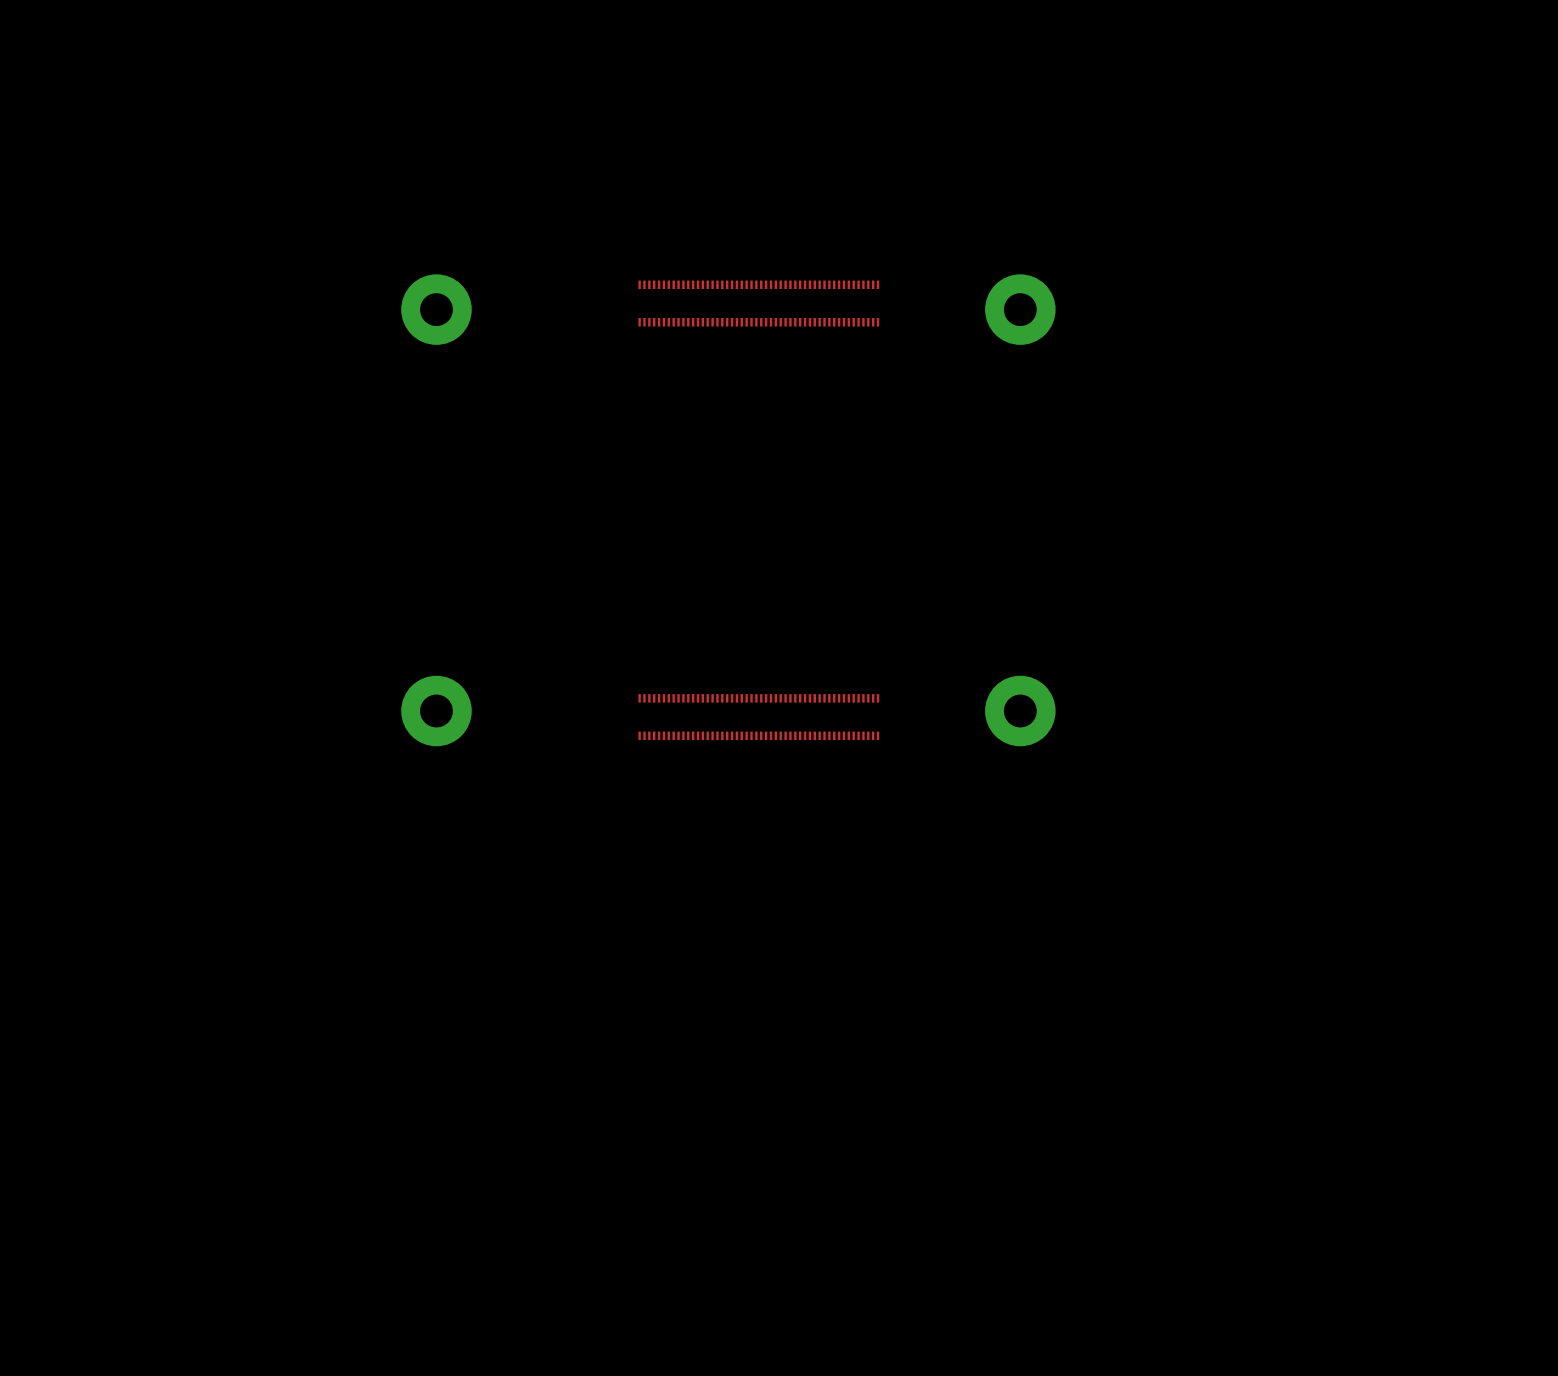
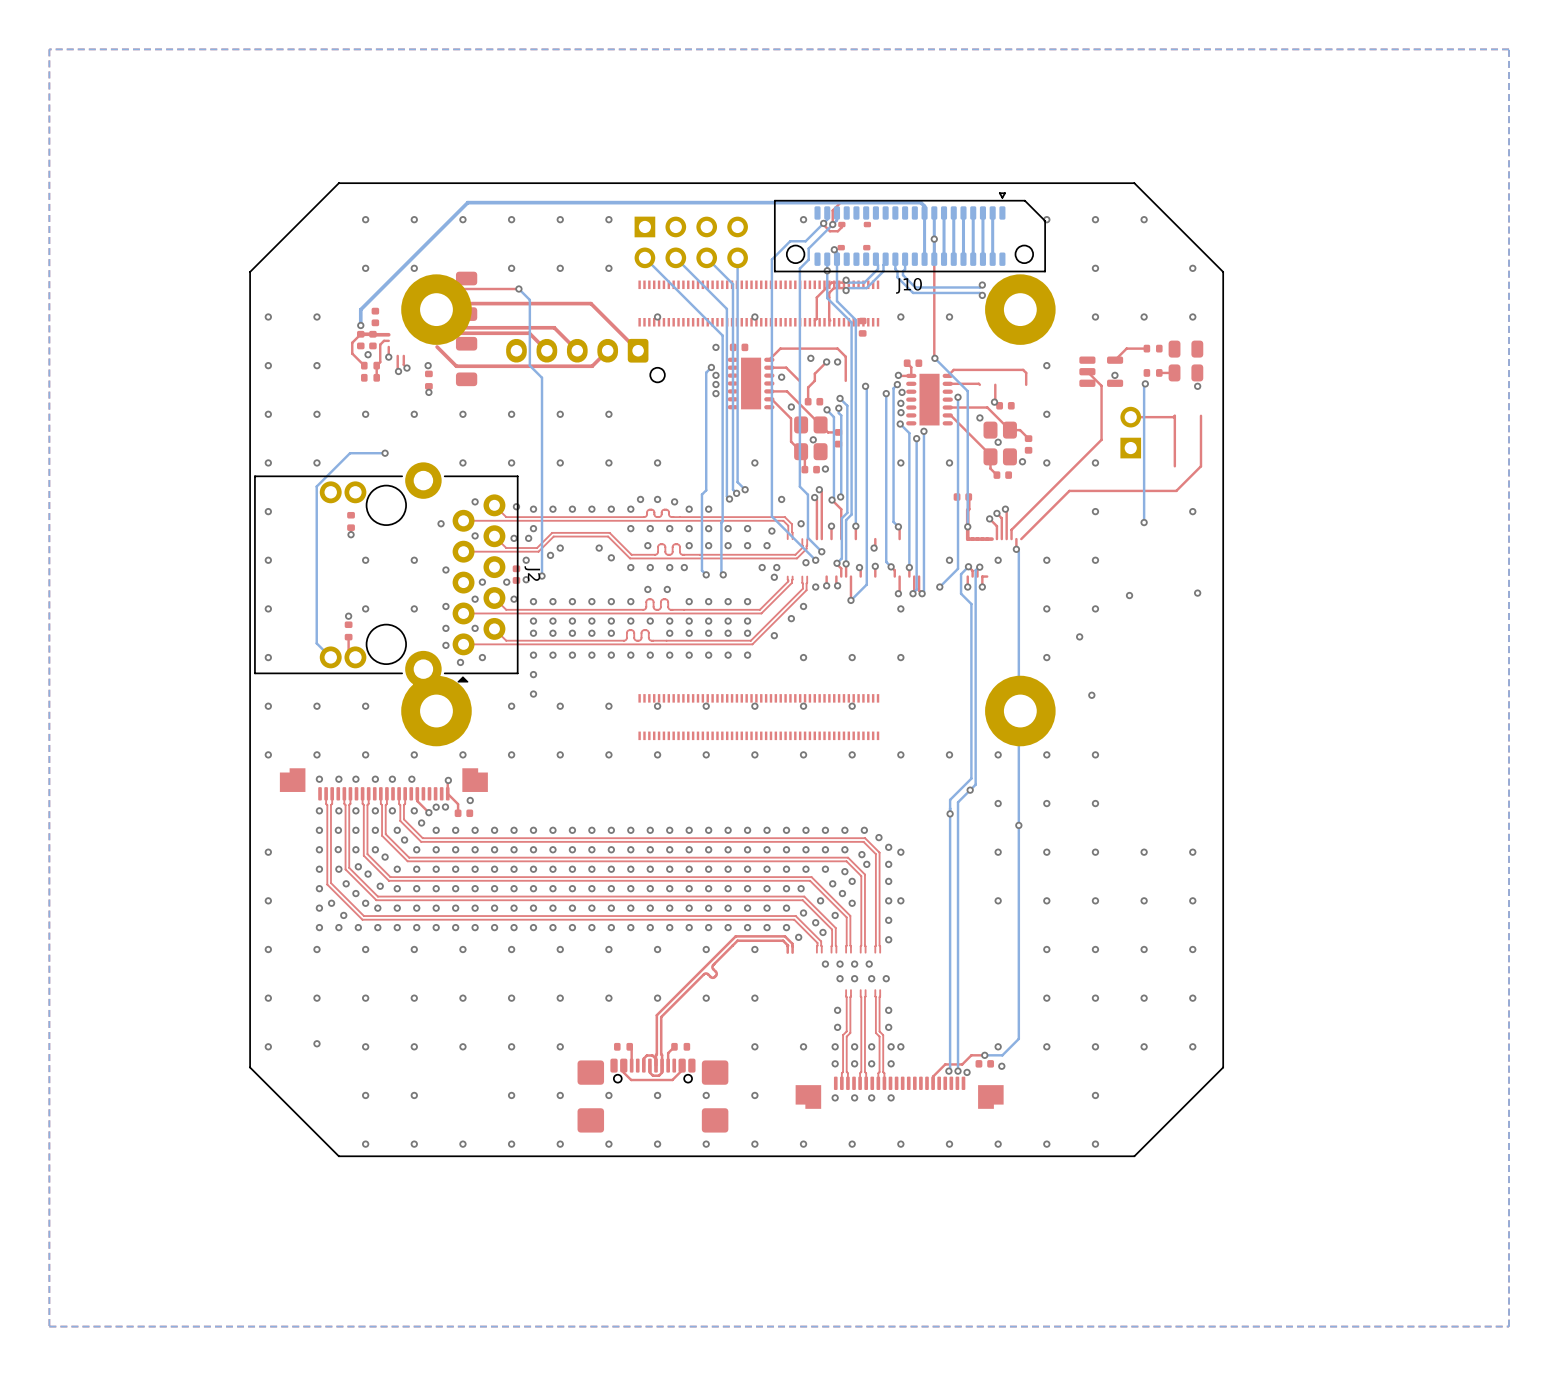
bottom zone outline: none -> (1509, 49) (49, 49) (49, 1326) (1509, 1326) (1509, 49)
board edge: none -> (1134, 183) (1223, 271) (1223, 1067) (1134, 1156) (338, 1156) (250, 1067) (250, 271) (338, 183) (1134, 183)
top track: none -> (841, 201) (832, 210) (832, 224)
bottom track: none -> (827, 212) (827, 219) (805, 241) (790, 241) (771, 259) (771, 516) (815, 560)
bottom track: none -> (836, 212) (836, 220) (808, 248) (808, 259) (799, 268) (799, 486) (807, 494) (807, 537) (821, 551)
bottom track: none -> (934, 212) (934, 259)
bottom track: none -> (944, 212) (944, 259)
bottom track: none -> (953, 212) (953, 259)
bottom track: none -> (963, 212) (963, 259)
bottom track: none -> (973, 212) (973, 259)
bottom track: none -> (982, 212) (982, 259)
bottom track: none -> (992, 212) (992, 259)
via: none -> (365, 219)
via: none -> (414, 219)
via: none -> (462, 219)
via: none -> (511, 219)
via: none -> (560, 219)
via: none -> (608, 219)
via: none -> (803, 219)
via: none -> (1046, 219)
via: none -> (1095, 219)
via: none -> (1144, 219)
top track: none -> (823, 223) (829, 231) (837, 231) (841, 224)
via: none -> (823, 223)
via: none -> (832, 224)
part: none -> (854, 224)
J10: none -> (909, 232)
top track: none -> (934, 239) (934, 358)
via: none -> (934, 239)
part: none -> (691, 242)
part: none -> (854, 247)
bottom track: none -> (834, 249) (836, 252) (836, 301) (855, 320) (855, 526)
via: none -> (834, 249)
bottom track: none -> (644, 257) (722, 335) (721, 573) (723, 574)
bottom track: none -> (675, 257) (726, 308) (726, 496) (729, 499)
bottom track: none -> (706, 257) (732, 284) (732, 489) (736, 493)
bottom track: none -> (737, 257) (737, 482) (745, 489)
bottom track: none -> (827, 259) (827, 298) (851, 322) (851, 514) (846, 520) (846, 563)
bottom track: none -> (875, 259) (878, 269) (864, 282) (848, 282) (846, 280)
bottom track: none -> (885, 259) (883, 271) (866, 288) (848, 288) (846, 290)
bottom track: none -> (895, 259) (897, 277) (913, 292) (979, 292) (982, 295)
bottom track: none -> (905, 259) (902, 275) (915, 287) (979, 287) (982, 285)
bottom track: none -> (924, 259) (924, 206) (920, 202) (467, 202) (360, 309) (360, 325)
via: none -> (365, 268)
via: none -> (414, 268)
via: none -> (511, 268)
via: none -> (560, 268)
via: none -> (608, 268)
via: none -> (1095, 268)
via: none -> (1192, 268)
via: none -> (827, 270)
top track: none -> (846, 280) (843, 282) (831, 282) (816, 297) (816, 318) (814, 320)
via: none -> (846, 280)
via: none -> (982, 285)
top track: none -> (518, 289) (436, 289) (422, 303) (422, 307)
bottom track: none -> (518, 289) (529, 299) (529, 365) (542, 377) (542, 576)
via: none -> (518, 289)
top track: none -> (846, 290) (843, 288) (833, 288) (829, 292) (830, 320)
via: none -> (846, 290)
via: none -> (982, 295)
part: none -> (466, 296)
via: none -> (268, 316)
via: none -> (316, 316)
part: none -> (375, 316)
top track: none -> (437, 316) (450, 303) (590, 303) (638, 350)
via: none -> (657, 316)
via: none -> (754, 316)
via: none -> (900, 316)
via: none -> (949, 316)
via: none -> (1095, 316)
via: none -> (1144, 316)
via: none -> (1192, 316)
via: none -> (360, 325)
part: none -> (862, 327)
top track: none -> (437, 328) (554, 327) (577, 350)
top track: none -> (388, 334) (360, 334) (352, 342) (352, 353) (364, 365)
top track: none -> (437, 334) (529, 333) (546, 350)
part: none -> (360, 340)
part: none -> (372, 340)
top track: none -> (388, 340) (384, 340) (380, 344) (380, 362) (376, 365) (376, 377)
top track: none -> (388, 346) (388, 357)
top track: none -> (437, 346) (456, 366) (592, 366) (607, 350)
via: none -> (715, 347)
part: none -> (739, 347)
top track: none -> (1146, 348) (1126, 348) (1115, 360)
part: none -> (1153, 348)
part: none -> (1185, 349)
via: none -> (368, 354)
top track: none -> (397, 355) (398, 371)
top track: none -> (403, 355) (403, 364) (406, 368)
via: none -> (388, 357)
via: none -> (810, 358)
bottom track: none -> (934, 358) (967, 391) (967, 526)
via: none -> (934, 358)
top track: none -> (769, 359) (780, 348) (837, 348) (845, 356) (845, 380)
part: none -> (585, 360)
part: none -> (466, 361)
top track: none -> (826, 361) (814, 373) (814, 380) (808, 387) (808, 401)
via: none -> (826, 361)
via: none -> (837, 361)
top track: none -> (907, 363) (911, 367) (911, 375) (898, 375)
part: none -> (913, 363)
via: none -> (268, 365)
via: none -> (316, 365)
part: none -> (370, 365)
via: none -> (428, 365)
via: none -> (1046, 365)
bottom track: none -> (711, 367) (706, 372) (706, 490) (701, 494) (701, 570) (706, 574)
via: none -> (711, 367)
top track: none -> (769, 367) (786, 367) (799, 380)
via: none -> (406, 368)
via: none -> (398, 371)
top track: none -> (1087, 371) (1101, 385) (1101, 439) (1011, 529) (1011, 539)
part: none -> (1101, 371)
part: none -> (1153, 372)
top track: none -> (1174, 372) (1159, 372)
part: none -> (1185, 372)
via: none -> (715, 375)
via: none -> (898, 375)
top track: none -> (947, 375) (953, 369) (1023, 369) (1026, 372) (1026, 384)
via: none -> (1114, 375)
part: none -> (370, 377)
via: none -> (781, 377)
part: none -> (428, 380)
part: none -> (751, 383)
top track: none -> (947, 383) (979, 384)
bottom track: none -> (1145, 383) (1144, 522)
via: none -> (1145, 383)
via: none -> (715, 384)
bottom track: none -> (897, 384) (893, 388) (893, 521) (898, 526)
via: none -> (897, 384)
top track: none -> (995, 384) (994, 402) (999, 405)
bottom track: none -> (865, 386) (866, 584) (850, 600)
via: none -> (865, 386)
via: none -> (1197, 386)
top track: none -> (769, 391) (787, 391) (828, 432) (838, 432)
via: none -> (428, 392)
via: none -> (902, 392)
via: none -> (715, 393)
bottom track: none -> (886, 393) (886, 561) (891, 566)
via: none -> (886, 393)
bottom track: none -> (958, 397) (958, 568) (939, 587)
via: none -> (958, 397)
bottom track: none -> (840, 398) (847, 405) (847, 512) (841, 518) (841, 558) (837, 563)
via: none -> (840, 398)
top track: none -> (769, 399) (771, 399) (791, 418) (791, 441) (804, 455) (804, 469)
part: none -> (929, 399)
part: none -> (813, 401)
via: none -> (994, 402)
via: none -> (900, 403)
part: none -> (1005, 405)
via: none -> (791, 406)
top track: none -> (947, 407) (987, 407) (1009, 430) (1020, 430) (1028, 438)
bottom track: none -> (838, 408) (838, 413) (841, 415) (840, 497)
via: none -> (838, 408)
bottom track: none -> (827, 409) (833, 417) (833, 498) (832, 500)
via: none -> (827, 409)
via: none -> (901, 412)
via: none -> (268, 414)
via: none -> (316, 414)
via: none -> (365, 414)
via: none -> (414, 414)
via: none -> (462, 414)
via: none -> (511, 414)
via: none -> (560, 414)
via: none -> (608, 414)
via: none -> (1046, 414)
top track: none -> (947, 415) (950, 415) (990, 455) (990, 468) (996, 475)
top track: none -> (1200, 415) (1200, 466) (1176, 490) (1069, 490) (1021, 539)
via: none -> (979, 417)
top track: none -> (1130, 417) (1174, 415) (1174, 466)
bottom track: none -> (900, 424) (909, 433) (909, 567)
via: none -> (900, 424)
bottom track: none -> (923, 431) (923, 591) (922, 593)
via: none -> (923, 431)
part: none -> (1130, 432)
part: none -> (810, 438)
part: none -> (838, 438)
bottom track: none -> (916, 438) (916, 589) (913, 593)
via: none -> (916, 438)
via: none -> (813, 439)
via: none -> (998, 442)
part: none -> (1000, 443)
part: none -> (1028, 444)
bottom track: none -> (385, 453) (350, 453) (316, 486) (316, 643) (330, 657)
via: none -> (385, 453)
via: none -> (1022, 461)
via: none -> (268, 462)
via: none -> (316, 462)
via: none -> (462, 462)
via: none -> (511, 462)
via: none -> (560, 462)
via: none -> (608, 462)
via: none -> (657, 462)
via: none -> (754, 462)
via: none -> (900, 462)
via: none -> (949, 462)
via: none -> (1046, 462)
via: none -> (1095, 462)
part: none -> (810, 469)
via: none -> (825, 469)
part: none -> (1002, 475)
via: none -> (745, 489)
top track: none -> (819, 489) (821, 492) (821, 539)
via: none -> (819, 489)
via: none -> (736, 493)
top track: none -> (814, 497) (816, 499) (816, 539)
via: none -> (814, 497)
via: none -> (840, 497)
part: none -> (962, 497)
top track: none -> (968, 497) (967, 539) (992, 539)
via: none -> (640, 499)
via: none -> (657, 499)
via: none -> (729, 499)
via: none -> (781, 499)
top track: none -> (832, 500) (841, 509) (841, 539)
via: none -> (832, 500)
via: none -> (475, 501)
via: none -> (674, 501)
top track: none -> (494, 505) (506, 517) (644, 517) (650, 509) (653, 510) (655, 516) (658, 517) (664, 509) (668, 510) (671, 517) (784, 517) (791, 524) (792, 539)
via: none -> (516, 506)
via: none -> (533, 509)
via: none -> (552, 509)
via: none -> (572, 509)
via: none -> (591, 509)
via: none -> (611, 509)
via: none -> (630, 509)
via: none -> (689, 509)
via: none -> (708, 509)
top track: none -> (1005, 509) (1006, 539)
via: none -> (1005, 509)
via: none -> (268, 511)
via: none -> (1095, 511)
via: none -> (1192, 511)
top track: none -> (996, 513) (1001, 518) (1001, 539)
via: none -> (996, 513)
top track: none -> (989, 518) (996, 526) (996, 539)
via: none -> (989, 518)
top track: none -> (463, 520) (783, 520) (788, 525) (787, 539)
part: none -> (351, 521)
via: none -> (1144, 522)
via: none -> (441, 523)
via: none -> (801, 523)
top track: none -> (831, 526) (831, 539)
via: none -> (831, 526)
top track: none -> (855, 526) (855, 539)
via: none -> (855, 526)
top track: none -> (898, 526) (899, 539)
via: none -> (898, 526)
via: none -> (967, 526)
via: none -> (533, 528)
via: none -> (630, 528)
via: none -> (650, 528)
via: none -> (669, 528)
via: none -> (689, 528)
via: none -> (708, 528)
via: none -> (728, 528)
via: none -> (747, 528)
via: none -> (771, 531)
via: none -> (351, 534)
via: none -> (475, 535)
top track: none -> (494, 536) (506, 548) (537, 548) (552, 532) (609, 532) (631, 554) (656, 554) (658, 545) (660, 544) (664, 545) (665, 552) (667, 554) (672, 553) (672, 545) (677, 544) (679, 545) (680, 552) (682, 554) (795, 554) (802, 547) (802, 539)
via: none -> (514, 538)
via: none -> (528, 538)
top track: none -> (807, 539) (806, 548) (796, 558) (630, 558) (608, 536) (553, 536) (538, 551) (463, 551)
top track: none -> (875, 539) (874, 548)
top track: none -> (1016, 539) (1016, 549)
via: none -> (647, 545)
via: none -> (689, 545)
via: none -> (708, 545)
via: none -> (728, 545)
via: none -> (747, 545)
via: none -> (767, 545)
via: none -> (560, 548)
via: none -> (599, 548)
via: none -> (874, 548)
bottom track: none -> (1016, 549) (1018, 551) (1018, 1038) (1002, 1055) (984, 1055)
via: none -> (1016, 549)
via: none -> (821, 551)
via: none -> (550, 555)
via: none -> (611, 557)
via: none -> (268, 560)
via: none -> (365, 560)
via: none -> (414, 560)
via: none -> (526, 560)
via: none -> (815, 560)
via: none -> (949, 560)
via: none -> (998, 560)
via: none -> (1046, 560)
via: none -> (1095, 560)
via: none -> (805, 562)
top track: none -> (837, 563) (841, 568) (841, 576)
via: none -> (837, 563)
top track: none -> (846, 563) (846, 576)
via: none -> (846, 563)
top track: none -> (875, 566) (875, 576)
via: none -> (875, 566)
top track: none -> (891, 566) (894, 570) (894, 576)
via: none -> (891, 566)
top track: none -> (968, 566) (972, 570) (972, 576)
bottom track: none -> (968, 566) (961, 574) (961, 593) (971, 604) (971, 778) (950, 799) (948, 1071)
via: none -> (968, 566)
via: none -> (630, 567)
via: none -> (650, 567)
via: none -> (669, 567)
via: none -> (684, 567)
via: none -> (762, 567)
via: none -> (776, 567)
top track: none -> (859, 567) (860, 576)
via: none -> (859, 567)
top track: none -> (909, 567) (909, 576)
via: none -> (909, 567)
top track: none -> (979, 567) (977, 568) (977, 576)
bottom track: none -> (979, 567) (975, 570) (975, 784) (958, 802) (958, 1071)
via: none -> (979, 567)
via: none -> (445, 569)
J2: none -> (386, 574)
part: none -> (516, 574)
via: none -> (706, 574)
via: none -> (723, 574)
via: none -> (542, 576)
top track: none -> (787, 576) (788, 581) (759, 609) (670, 609) (668, 607) (667, 600) (665, 599) (661, 600) (660, 608) (656, 609) (653, 607) (653, 600) (650, 599) (646, 600) (646, 607) (643, 609) (506, 609) (494, 598)
top track: none -> (792, 576) (791, 582) (761, 613) (463, 613)
top track: none -> (802, 576) (802, 588) (750, 640) (651, 640) (648, 638) (648, 631) (645, 630) (641, 631) (641, 638) (638, 640) (634, 639) (633, 631) (629, 630) (627, 631) (626, 638) (624, 640) (506, 640) (494, 628)
top track: none -> (807, 576) (806, 590) (752, 644) (463, 644)
top track: none -> (826, 576) (826, 585)
top track: none -> (836, 576) (837, 585)
top track: none -> (850, 576) (850, 600)
top track: none -> (899, 576) (898, 593)
top track: none -> (914, 576) (913, 593)
top track: none -> (919, 576) (919, 590) (922, 593)
top track: none -> (967, 576) (967, 587)
top track: none -> (987, 576) (982, 576) (982, 587)
via: none -> (774, 577)
via: none -> (526, 579)
via: none -> (482, 582)
via: none -> (506, 582)
via: none -> (826, 585)
via: none -> (837, 585)
via: none -> (815, 587)
via: none -> (939, 587)
via: none -> (967, 587)
via: none -> (982, 587)
via: none -> (647, 589)
via: none -> (667, 589)
via: none -> (898, 593)
via: none -> (913, 593)
via: none -> (922, 593)
via: none -> (1197, 593)
via: none -> (1129, 595)
via: none -> (475, 599)
via: none -> (514, 599)
via: none -> (850, 600)
via: none -> (533, 601)
via: none -> (552, 601)
via: none -> (572, 601)
via: none -> (591, 601)
via: none -> (611, 601)
via: none -> (630, 601)
via: none -> (689, 601)
via: none -> (708, 601)
via: none -> (728, 601)
via: none -> (747, 601)
via: none -> (445, 606)
via: none -> (803, 606)
via: none -> (268, 608)
via: none -> (365, 608)
via: none -> (414, 608)
via: none -> (900, 608)
via: none -> (1046, 608)
via: none -> (1095, 608)
via: none -> (348, 616)
via: none -> (791, 618)
via: none -> (533, 621)
via: none -> (552, 621)
via: none -> (572, 621)
via: none -> (591, 621)
via: none -> (611, 621)
via: none -> (630, 621)
via: none -> (650, 621)
via: none -> (669, 621)
via: none -> (689, 621)
via: none -> (708, 621)
via: none -> (728, 621)
via: none -> (747, 621)
via: none -> (445, 628)
via: none -> (475, 628)
part: none -> (348, 630)
via: none -> (533, 633)
via: none -> (552, 633)
via: none -> (572, 633)
via: none -> (591, 633)
via: none -> (611, 633)
via: none -> (669, 633)
via: none -> (689, 633)
via: none -> (708, 633)
via: none -> (728, 633)
via: none -> (747, 633)
via: none -> (774, 635)
via: none -> (1079, 636)
top track: none -> (348, 637) (348, 650) (355, 657)
via: none -> (445, 645)
via: none -> (533, 655)
via: none -> (552, 655)
via: none -> (572, 655)
via: none -> (591, 655)
via: none -> (611, 655)
via: none -> (630, 655)
via: none -> (650, 655)
via: none -> (669, 655)
via: none -> (689, 655)
via: none -> (708, 655)
via: none -> (728, 655)
via: none -> (747, 655)
via: none -> (268, 657)
via: none -> (482, 657)
via: none -> (803, 657)
via: none -> (852, 657)
via: none -> (900, 657)
via: none -> (1046, 657)
via: none -> (460, 662)
via: none -> (533, 674)
via: none -> (533, 694)
via: none -> (1091, 695)
via: none -> (268, 706)
via: none -> (316, 706)
via: none -> (365, 706)
via: none -> (511, 706)
via: none -> (560, 706)
via: none -> (608, 706)
via: none -> (657, 706)
via: none -> (706, 706)
via: none -> (754, 706)
via: none -> (803, 706)
via: none -> (852, 706)
via: none -> (268, 754)
via: none -> (316, 754)
via: none -> (365, 754)
via: none -> (414, 754)
via: none -> (462, 754)
via: none -> (511, 754)
via: none -> (560, 754)
via: none -> (608, 754)
via: none -> (657, 754)
via: none -> (706, 754)
via: none -> (754, 754)
via: none -> (803, 754)
via: none -> (852, 754)
via: none -> (900, 754)
via: none -> (949, 754)
via: none -> (998, 754)
via: none -> (1046, 754)
via: none -> (1095, 754)
via: none -> (319, 779)
via: none -> (338, 779)
via: none -> (355, 779)
via: none -> (375, 779)
via: none -> (392, 779)
via: none -> (411, 779)
top track: none -> (448, 780) (447, 793) (458, 804) (458, 813)
via: none -> (448, 780)
part: none -> (383, 784)
via: none -> (970, 790)
top track: none -> (326, 793) (327, 884) (362, 919) (794, 919) (817, 942) (816, 952)
top track: none -> (332, 793) (330, 883) (363, 916) (795, 916) (821, 941) (821, 952)
top track: none -> (344, 793) (345, 869) (376, 900) (802, 900) (832, 929) (831, 952)
top track: none -> (350, 793) (349, 867) (377, 896) (804, 896) (835, 928) (836, 952)
top track: none -> (362, 793) (363, 855) (388, 880) (810, 880) (846, 917) (846, 952)
top track: none -> (368, 793) (367, 854) (390, 877) (811, 877) (850, 915) (850, 952)
top track: none -> (380, 793) (382, 835) (407, 861) (846, 861) (861, 876) (860, 952)
top track: none -> (386, 793) (385, 834) (409, 857) (848, 857) (864, 874) (865, 952)
top track: none -> (399, 793) (400, 820) (421, 841) (863, 841) (875, 854) (875, 952)
top track: none -> (405, 793) (403, 819) (422, 838) (865, 838) (879, 852) (880, 952)
top track: none -> (417, 793) (417, 801) (428, 812)
via: none -> (470, 800)
via: none -> (998, 803)
via: none -> (1046, 803)
via: none -> (1095, 803)
via: none -> (436, 807)
via: none -> (445, 807)
via: none -> (319, 810)
via: none -> (338, 810)
via: none -> (355, 810)
via: none -> (375, 810)
via: none -> (392, 810)
via: none -> (414, 810)
via: none -> (428, 812)
part: none -> (463, 813)
via: none -> (950, 813)
via: none -> (421, 822)
via: none -> (1018, 825)
via: none -> (319, 830)
via: none -> (338, 830)
via: none -> (355, 830)
via: none -> (375, 830)
via: none -> (397, 830)
via: none -> (436, 830)
via: none -> (455, 830)
via: none -> (475, 830)
via: none -> (494, 830)
via: none -> (514, 830)
via: none -> (533, 830)
via: none -> (552, 830)
via: none -> (572, 830)
via: none -> (591, 830)
via: none -> (611, 830)
via: none -> (630, 830)
via: none -> (650, 830)
via: none -> (669, 830)
via: none -> (689, 830)
via: none -> (708, 830)
via: none -> (728, 830)
via: none -> (747, 830)
via: none -> (767, 830)
via: none -> (786, 830)
via: none -> (805, 830)
via: none -> (825, 830)
via: none -> (844, 830)
via: none -> (864, 830)
via: none -> (878, 837)
via: none -> (404, 840)
via: none -> (888, 847)
via: none -> (319, 849)
via: none -> (338, 849)
via: none -> (355, 849)
via: none -> (375, 849)
via: none -> (416, 849)
via: none -> (436, 849)
via: none -> (455, 849)
via: none -> (475, 849)
via: none -> (494, 849)
via: none -> (514, 849)
via: none -> (533, 849)
via: none -> (552, 849)
via: none -> (572, 849)
via: none -> (591, 849)
via: none -> (611, 849)
via: none -> (630, 849)
via: none -> (650, 849)
via: none -> (669, 849)
via: none -> (689, 849)
via: none -> (708, 849)
via: none -> (728, 849)
via: none -> (747, 849)
via: none -> (767, 849)
via: none -> (786, 849)
via: none -> (805, 849)
via: none -> (825, 849)
via: none -> (844, 849)
via: none -> (268, 852)
via: none -> (900, 852)
via: none -> (998, 852)
via: none -> (1046, 852)
via: none -> (1095, 852)
via: none -> (1144, 852)
via: none -> (1192, 852)
via: none -> (861, 854)
via: none -> (385, 857)
via: none -> (866, 864)
via: none -> (888, 864)
via: none -> (358, 866)
via: none -> (319, 869)
via: none -> (338, 869)
via: none -> (397, 869)
via: none -> (416, 869)
via: none -> (436, 869)
via: none -> (455, 869)
via: none -> (475, 869)
via: none -> (494, 869)
via: none -> (514, 869)
via: none -> (533, 869)
via: none -> (552, 869)
via: none -> (572, 869)
via: none -> (591, 869)
via: none -> (611, 869)
via: none -> (630, 869)
via: none -> (650, 869)
via: none -> (669, 869)
via: none -> (689, 869)
via: none -> (708, 869)
via: none -> (728, 869)
via: none -> (747, 869)
via: none -> (767, 869)
via: none -> (786, 869)
via: none -> (805, 869)
via: none -> (825, 869)
via: none -> (844, 871)
via: none -> (368, 874)
via: none -> (852, 881)
via: none -> (888, 881)
via: none -> (346, 883)
via: none -> (832, 883)
via: none -> (380, 886)
via: none -> (319, 888)
via: none -> (397, 888)
via: none -> (416, 888)
via: none -> (436, 888)
via: none -> (455, 888)
via: none -> (475, 888)
via: none -> (494, 888)
via: none -> (514, 888)
via: none -> (533, 888)
via: none -> (552, 888)
via: none -> (572, 888)
via: none -> (591, 888)
via: none -> (611, 888)
via: none -> (630, 888)
via: none -> (650, 888)
via: none -> (669, 888)
via: none -> (689, 888)
via: none -> (708, 888)
via: none -> (728, 888)
via: none -> (747, 888)
via: none -> (767, 888)
via: none -> (786, 888)
via: none -> (801, 888)
via: none -> (355, 893)
via: none -> (842, 893)
via: none -> (268, 900)
via: none -> (820, 900)
via: none -> (888, 900)
via: none -> (900, 900)
via: none -> (998, 900)
via: none -> (1046, 900)
via: none -> (1095, 900)
via: none -> (1144, 900)
via: none -> (1192, 900)
via: none -> (331, 903)
via: none -> (365, 903)
via: none -> (852, 903)
via: none -> (319, 908)
via: none -> (377, 908)
via: none -> (397, 908)
via: none -> (416, 908)
via: none -> (436, 908)
via: none -> (455, 908)
via: none -> (475, 908)
via: none -> (494, 908)
via: none -> (514, 908)
via: none -> (533, 908)
via: none -> (552, 908)
via: none -> (572, 908)
via: none -> (591, 908)
via: none -> (611, 908)
via: none -> (630, 908)
via: none -> (650, 908)
via: none -> (669, 908)
via: none -> (689, 908)
via: none -> (708, 908)
via: none -> (728, 908)
via: none -> (747, 908)
via: none -> (767, 908)
via: none -> (786, 908)
via: none -> (803, 913)
via: none -> (343, 915)
via: none -> (835, 915)
via: none -> (888, 920)
via: none -> (815, 922)
via: none -> (319, 927)
via: none -> (338, 927)
via: none -> (358, 927)
via: none -> (377, 927)
via: none -> (397, 927)
via: none -> (416, 927)
via: none -> (436, 927)
via: none -> (455, 927)
via: none -> (475, 927)
via: none -> (494, 927)
via: none -> (514, 927)
via: none -> (533, 927)
via: none -> (552, 927)
via: none -> (572, 927)
via: none -> (591, 927)
via: none -> (611, 927)
via: none -> (630, 927)
via: none -> (650, 927)
via: none -> (669, 927)
via: none -> (689, 927)
via: none -> (708, 927)
via: none -> (728, 927)
via: none -> (747, 927)
via: none -> (767, 927)
via: none -> (786, 927)
via: none -> (822, 932)
via: none -> (798, 937)
via: none -> (888, 939)
via: none -> (268, 949)
via: none -> (316, 949)
via: none -> (365, 949)
via: none -> (414, 949)
via: none -> (462, 949)
via: none -> (511, 949)
via: none -> (560, 949)
via: none -> (608, 949)
via: none -> (657, 949)
via: none -> (706, 949)
via: none -> (754, 949)
via: none -> (1046, 949)
via: none -> (1095, 949)
via: none -> (1144, 949)
via: none -> (1192, 949)
top track: none -> (787, 952) (787, 945) (783, 940) (737, 940) (712, 965) (716, 973) (715, 975) (712, 977) (707, 973) (704, 974) (661, 1017) (662, 1072) (658, 1075) (653, 1075) (649, 1072) (649, 1065)
top track: none -> (792, 952) (792, 943) (784, 936) (735, 936) (656, 1015) (655, 1065)
via: none -> (825, 964)
via: none -> (840, 964)
via: none -> (854, 964)
via: none -> (869, 964)
via: none -> (840, 978)
via: none -> (854, 978)
via: none -> (871, 978)
via: none -> (886, 978)
top track: none -> (846, 990) (846, 1031) (843, 1035) (841, 1083)
top track: none -> (850, 990) (850, 1032) (846, 1036) (847, 1083)
top track: none -> (860, 990) (860, 1083)
top track: none -> (865, 990) (866, 1083)
top track: none -> (875, 990) (875, 1032) (879, 1036) (878, 1083)
top track: none -> (880, 990) (879, 1031) (883, 1035) (884, 1083)
via: none -> (268, 998)
via: none -> (316, 998)
via: none -> (365, 998)
via: none -> (414, 998)
via: none -> (462, 998)
via: none -> (511, 998)
via: none -> (560, 998)
via: none -> (608, 998)
via: none -> (657, 998)
via: none -> (706, 998)
via: none -> (754, 998)
via: none -> (1046, 998)
via: none -> (1095, 998)
via: none -> (1144, 998)
via: none -> (1192, 998)
via: none -> (837, 1010)
via: none -> (888, 1010)
via: none -> (837, 1027)
via: none -> (888, 1027)
via: none -> (316, 1043)
via: none -> (268, 1046)
via: none -> (365, 1046)
via: none -> (414, 1046)
via: none -> (462, 1046)
via: none -> (511, 1046)
via: none -> (560, 1046)
part: none -> (623, 1046)
top track: none -> (629, 1046) (631, 1048) (631, 1065)
top track: none -> (674, 1046) (668, 1053) (668, 1065)
part: none -> (680, 1046)
via: none -> (754, 1046)
via: none -> (803, 1046)
via: none -> (835, 1046)
via: none -> (854, 1046)
via: none -> (871, 1046)
via: none -> (891, 1046)
via: none -> (900, 1046)
via: none -> (998, 1046)
via: none -> (1046, 1046)
via: none -> (1095, 1046)
via: none -> (1144, 1046)
via: none -> (1192, 1046)
top track: none -> (984, 1055) (971, 1055) (962, 1064) (945, 1064) (933, 1076) (933, 1083)
via: none -> (984, 1055)
top track: none -> (655, 1058) (652, 1055) (646, 1055) (643, 1058) (643, 1065)
via: none -> (835, 1063)
via: none -> (854, 1063)
via: none -> (871, 1063)
via: none -> (891, 1063)
part: none -> (984, 1063)
top track: none -> (682, 1065) (682, 1070) (672, 1080) (631, 1080) (623, 1072) (623, 1065)
via: none -> (1001, 1066)
via: none -> (948, 1071)
via: none -> (958, 1071)
via: none -> (967, 1072)
part: none -> (899, 1092)
via: none -> (365, 1095)
via: none -> (414, 1095)
via: none -> (511, 1095)
via: none -> (560, 1095)
via: none -> (608, 1095)
part: none -> (652, 1095)
via: none -> (657, 1095)
via: none -> (706, 1095)
via: none -> (754, 1095)
via: none -> (1095, 1095)
via: none -> (835, 1097)
via: none -> (854, 1097)
via: none -> (871, 1097)
via: none -> (891, 1097)
via: none -> (365, 1144)
via: none -> (414, 1144)
via: none -> (462, 1144)
via: none -> (511, 1144)
via: none -> (560, 1144)
via: none -> (608, 1144)
via: none -> (657, 1144)
via: none -> (706, 1144)
via: none -> (754, 1144)
via: none -> (803, 1144)
via: none -> (852, 1144)
via: none -> (900, 1144)
via: none -> (949, 1144)
via: none -> (998, 1144)
via: none -> (1046, 1144)
via: none -> (1095, 1144)

